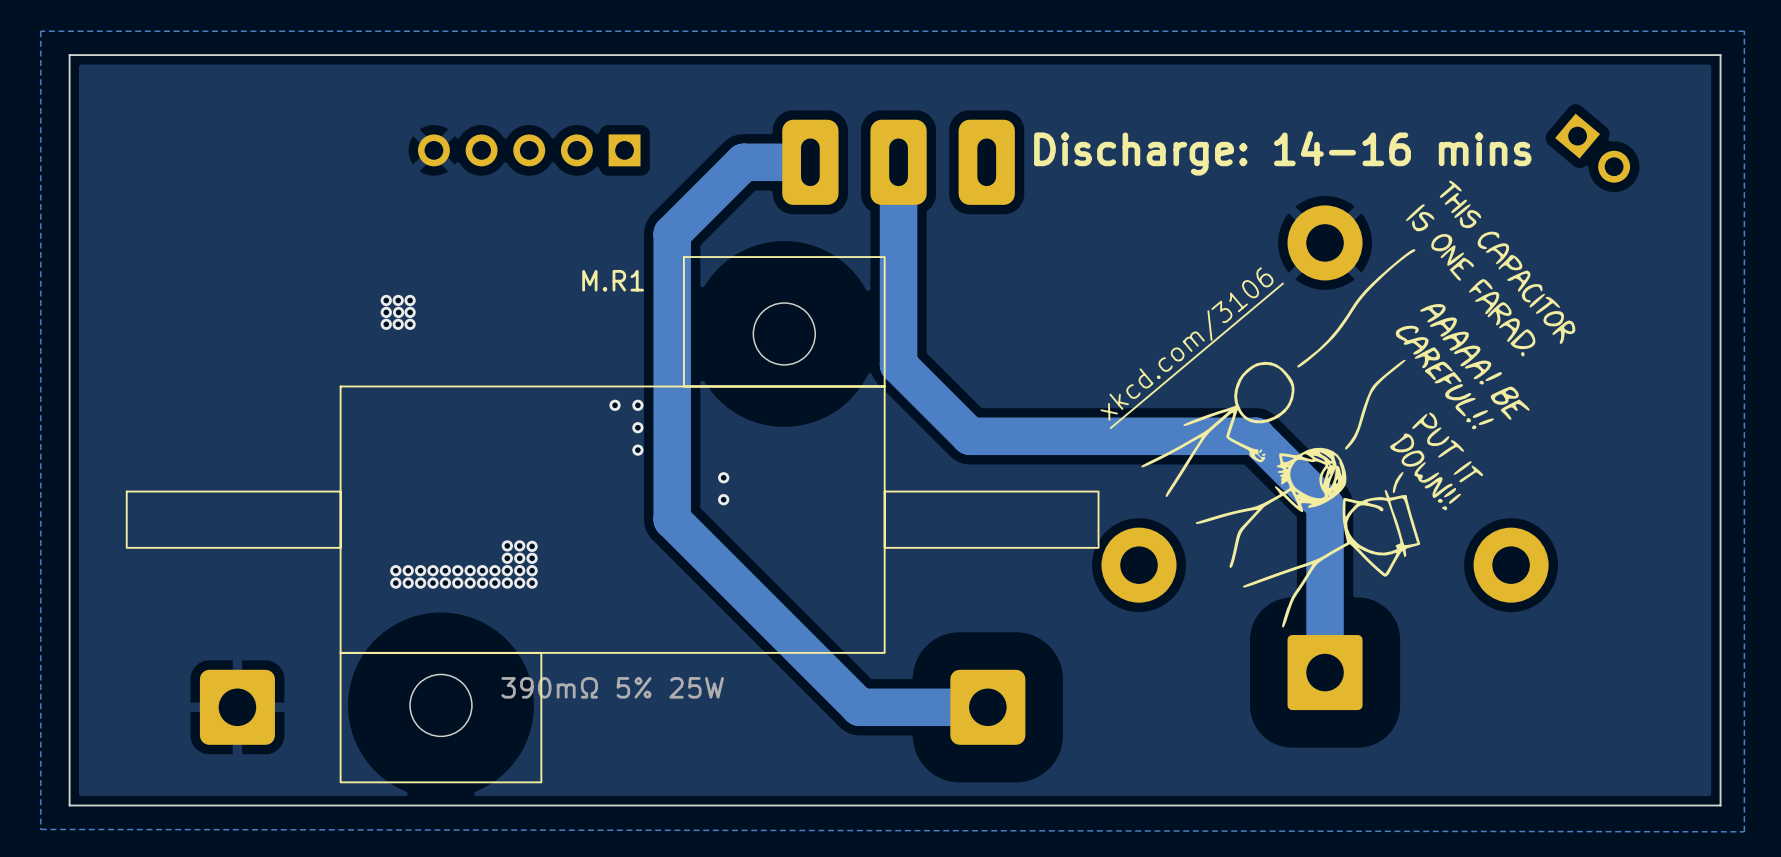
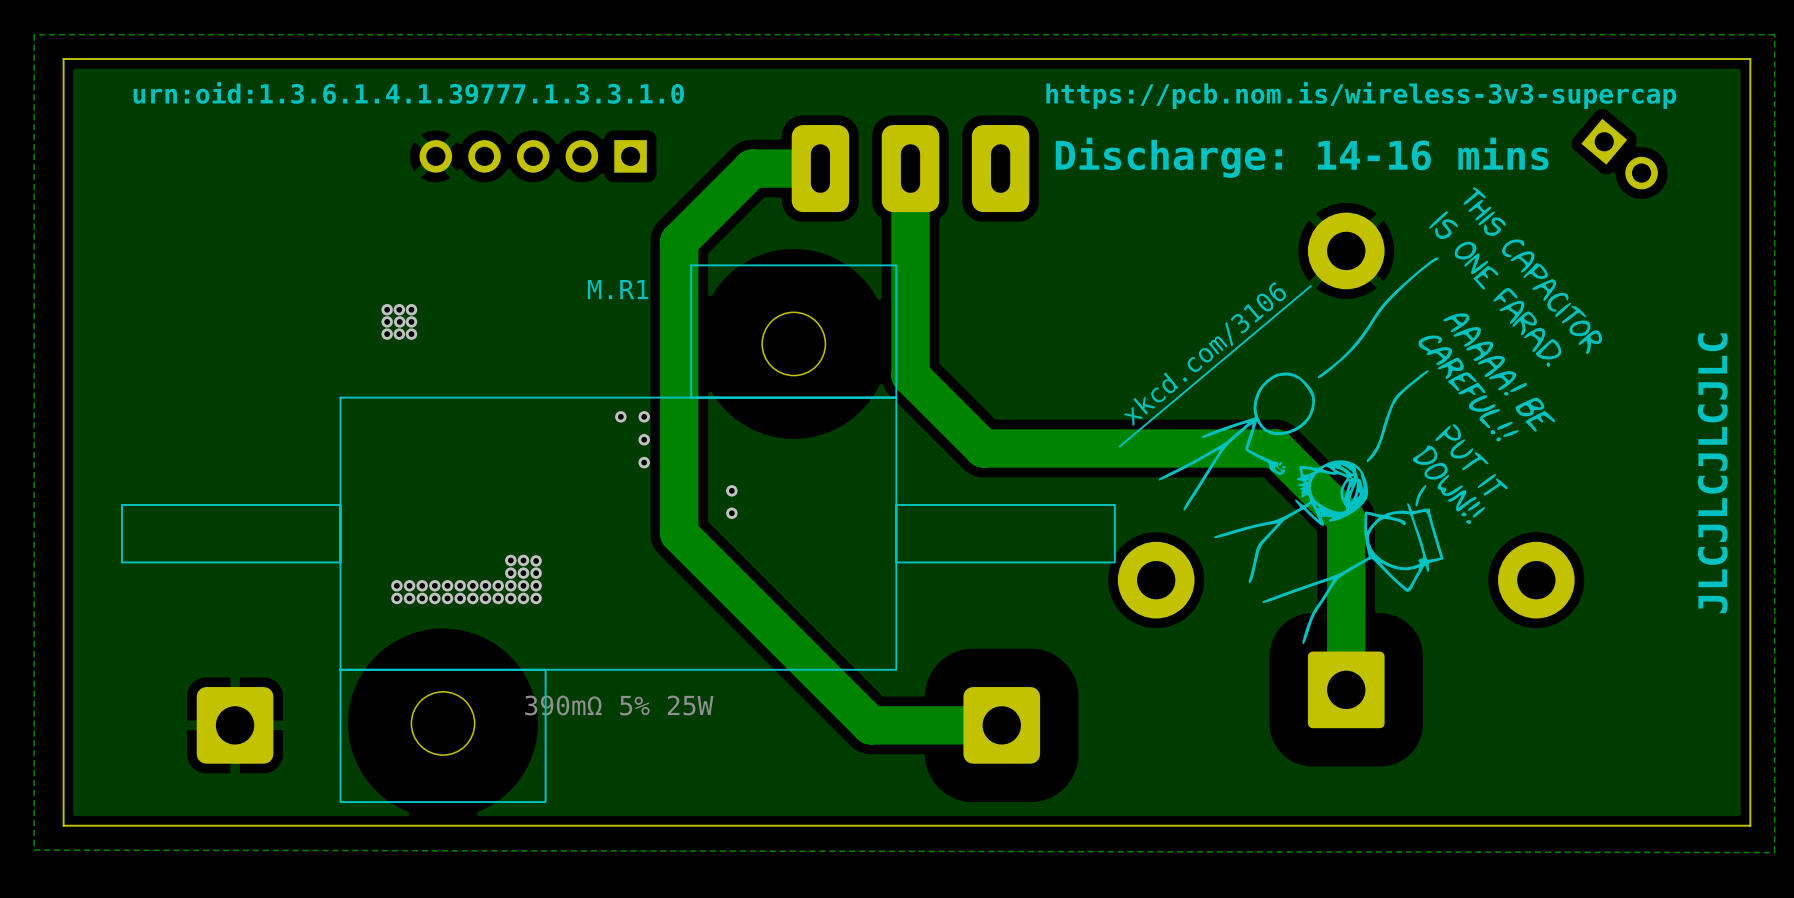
text: none -> urn:oid:1.3.6.1.4.1.39777.1.3.3.1.0 (408, 93)
text: none -> https://pcb.nom.is/wireless-3v3-supercap (1361, 95)
text: none -> JLCJLCJLCJLC (1712, 473)

